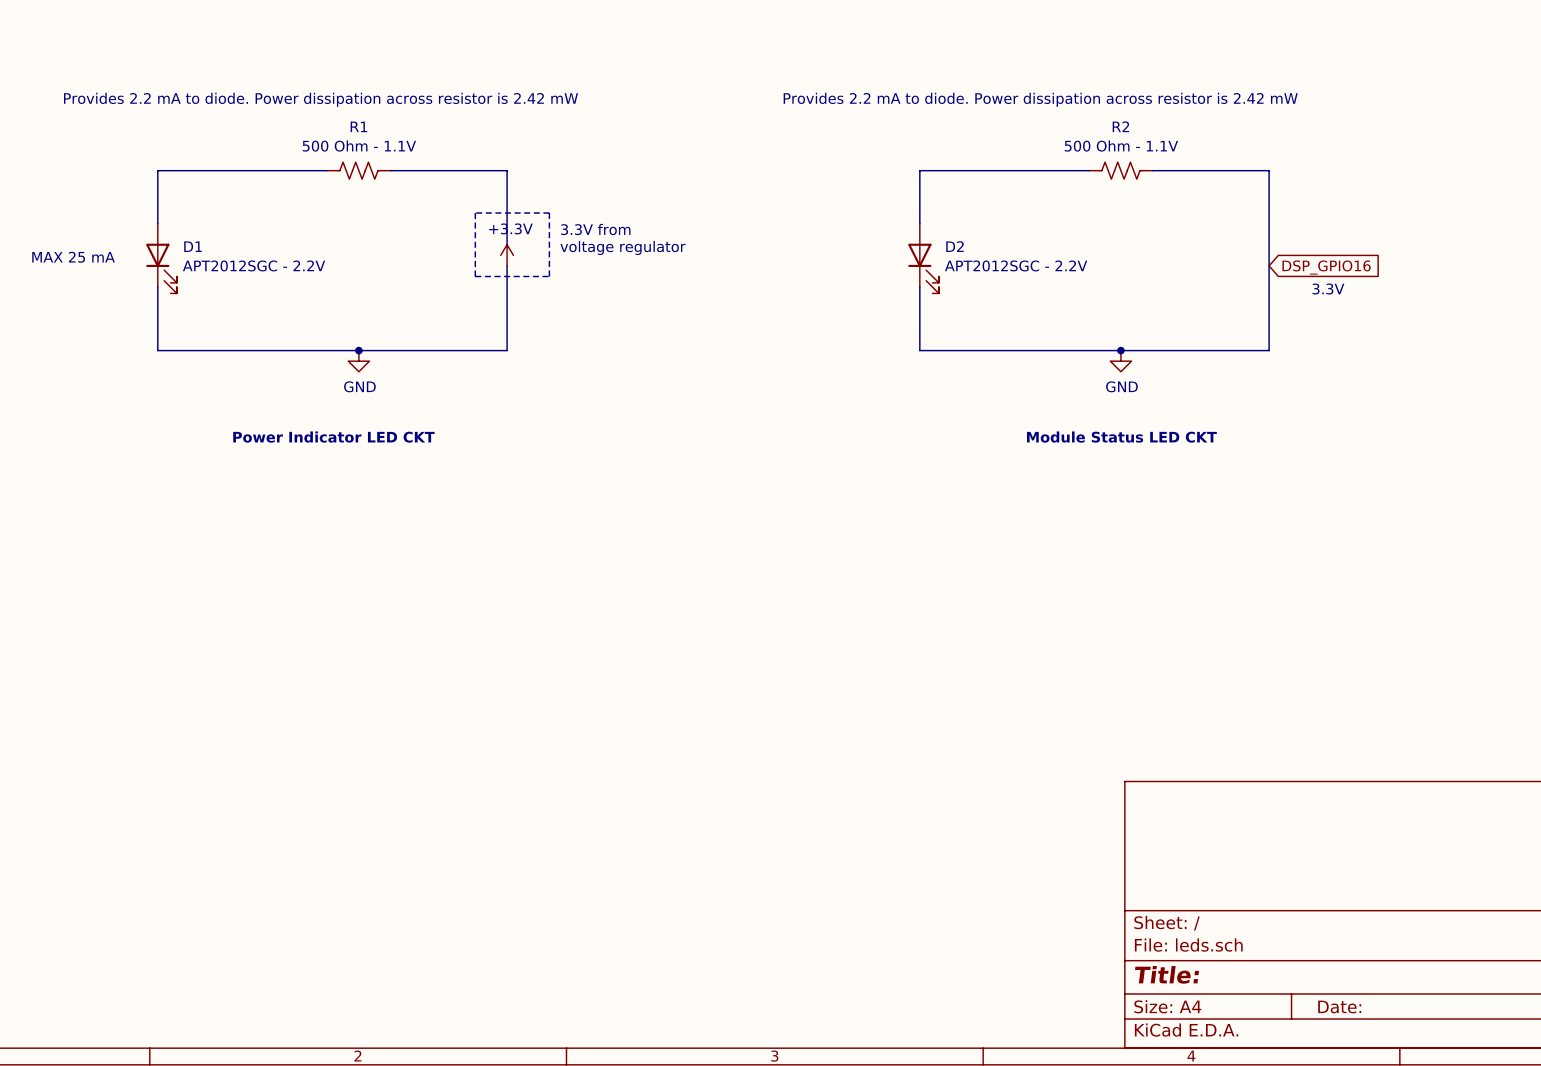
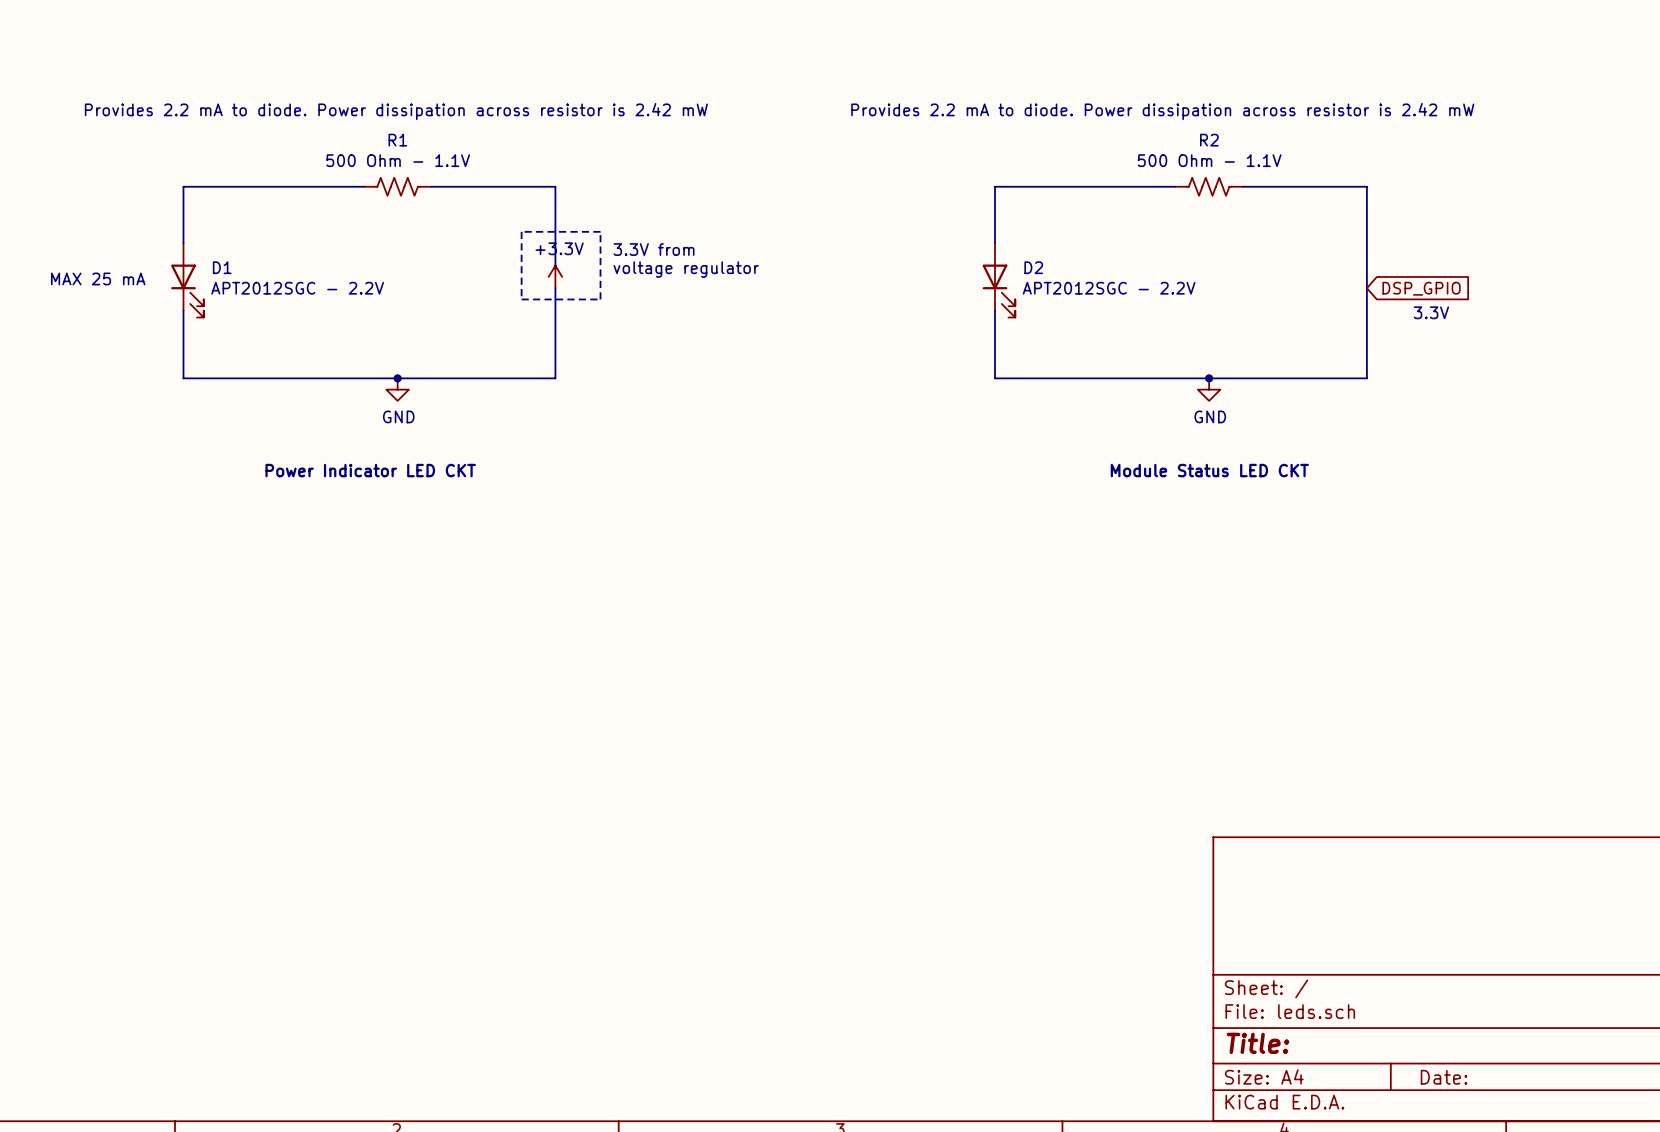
global label: DSP_GPIO16 (1326, 267) -> DSP_GPIO (1421, 288)

